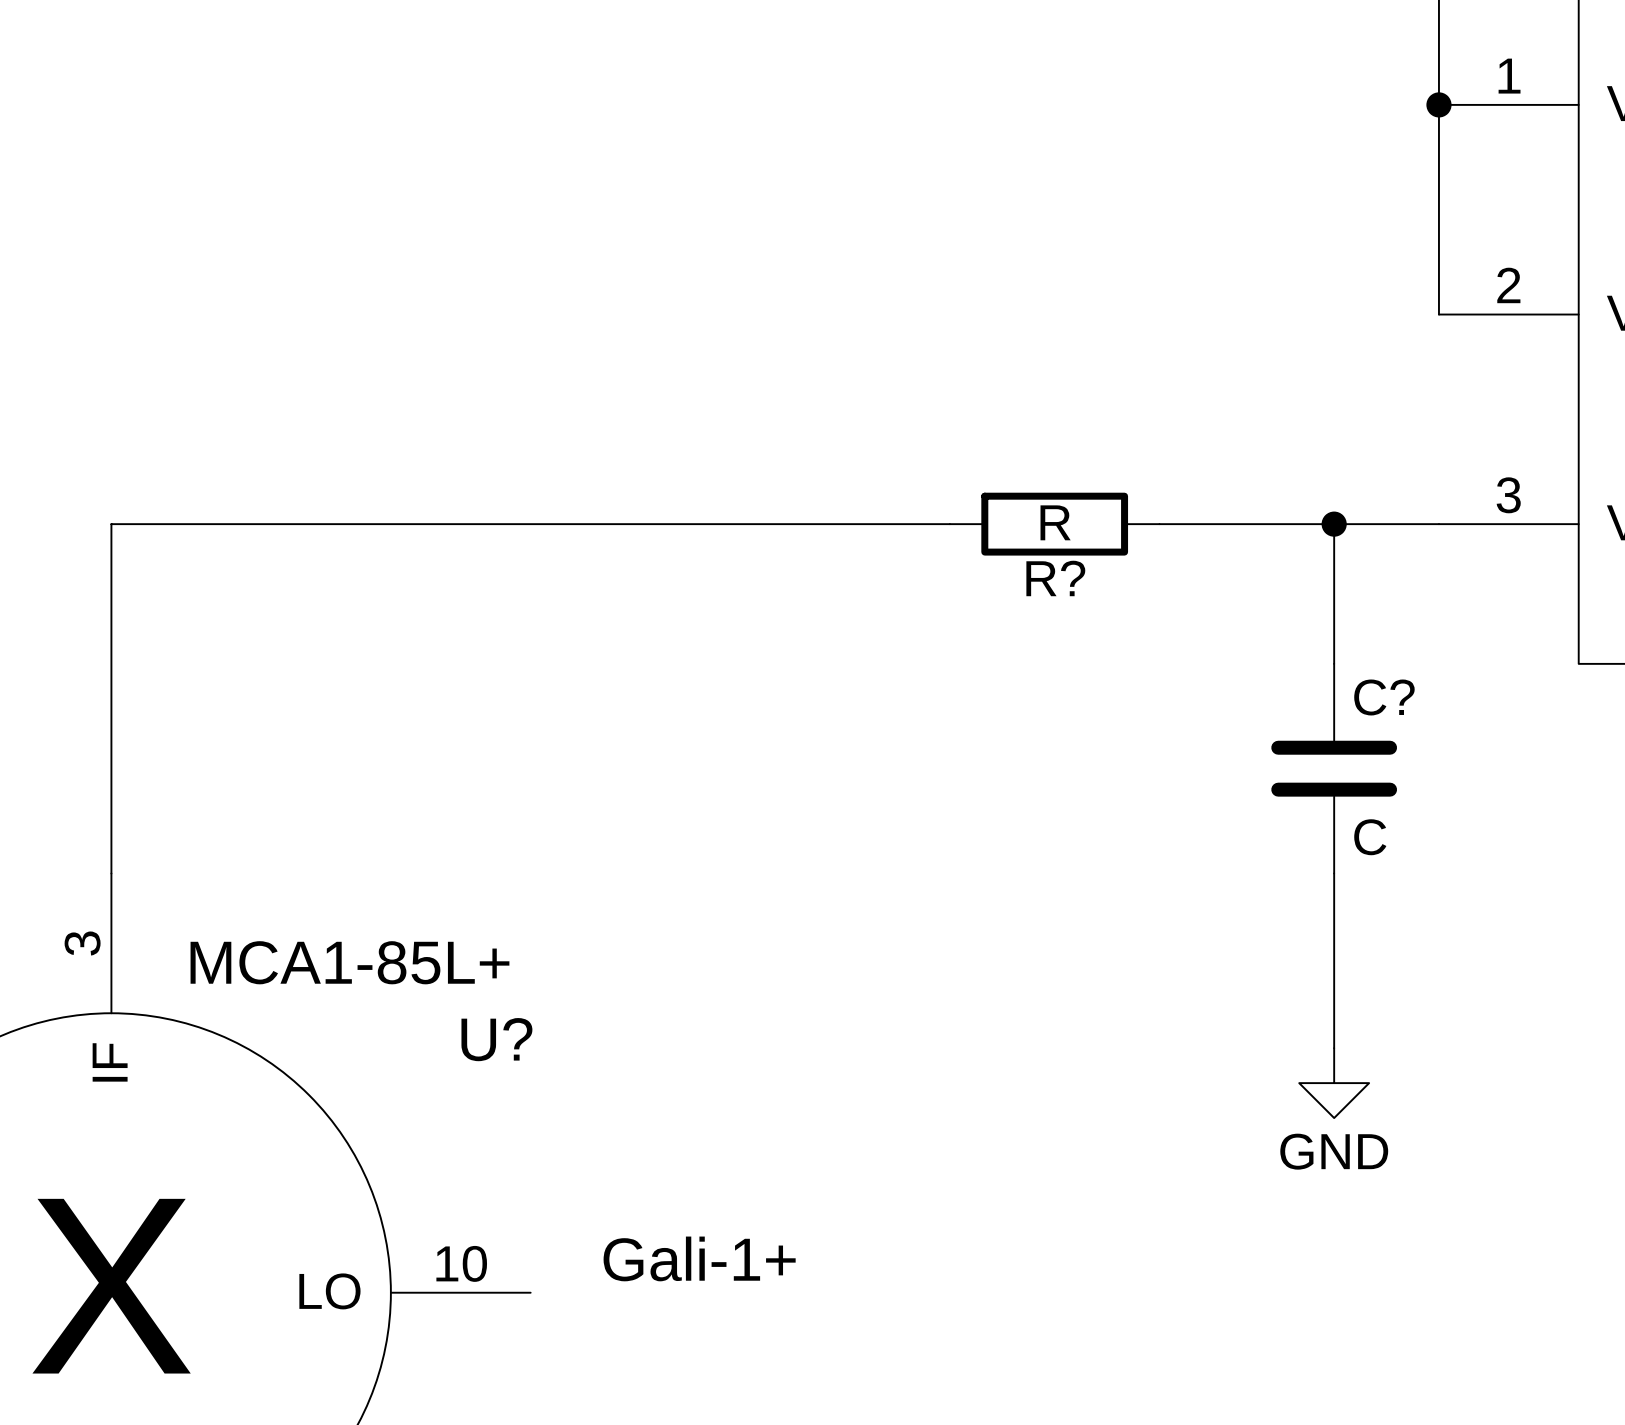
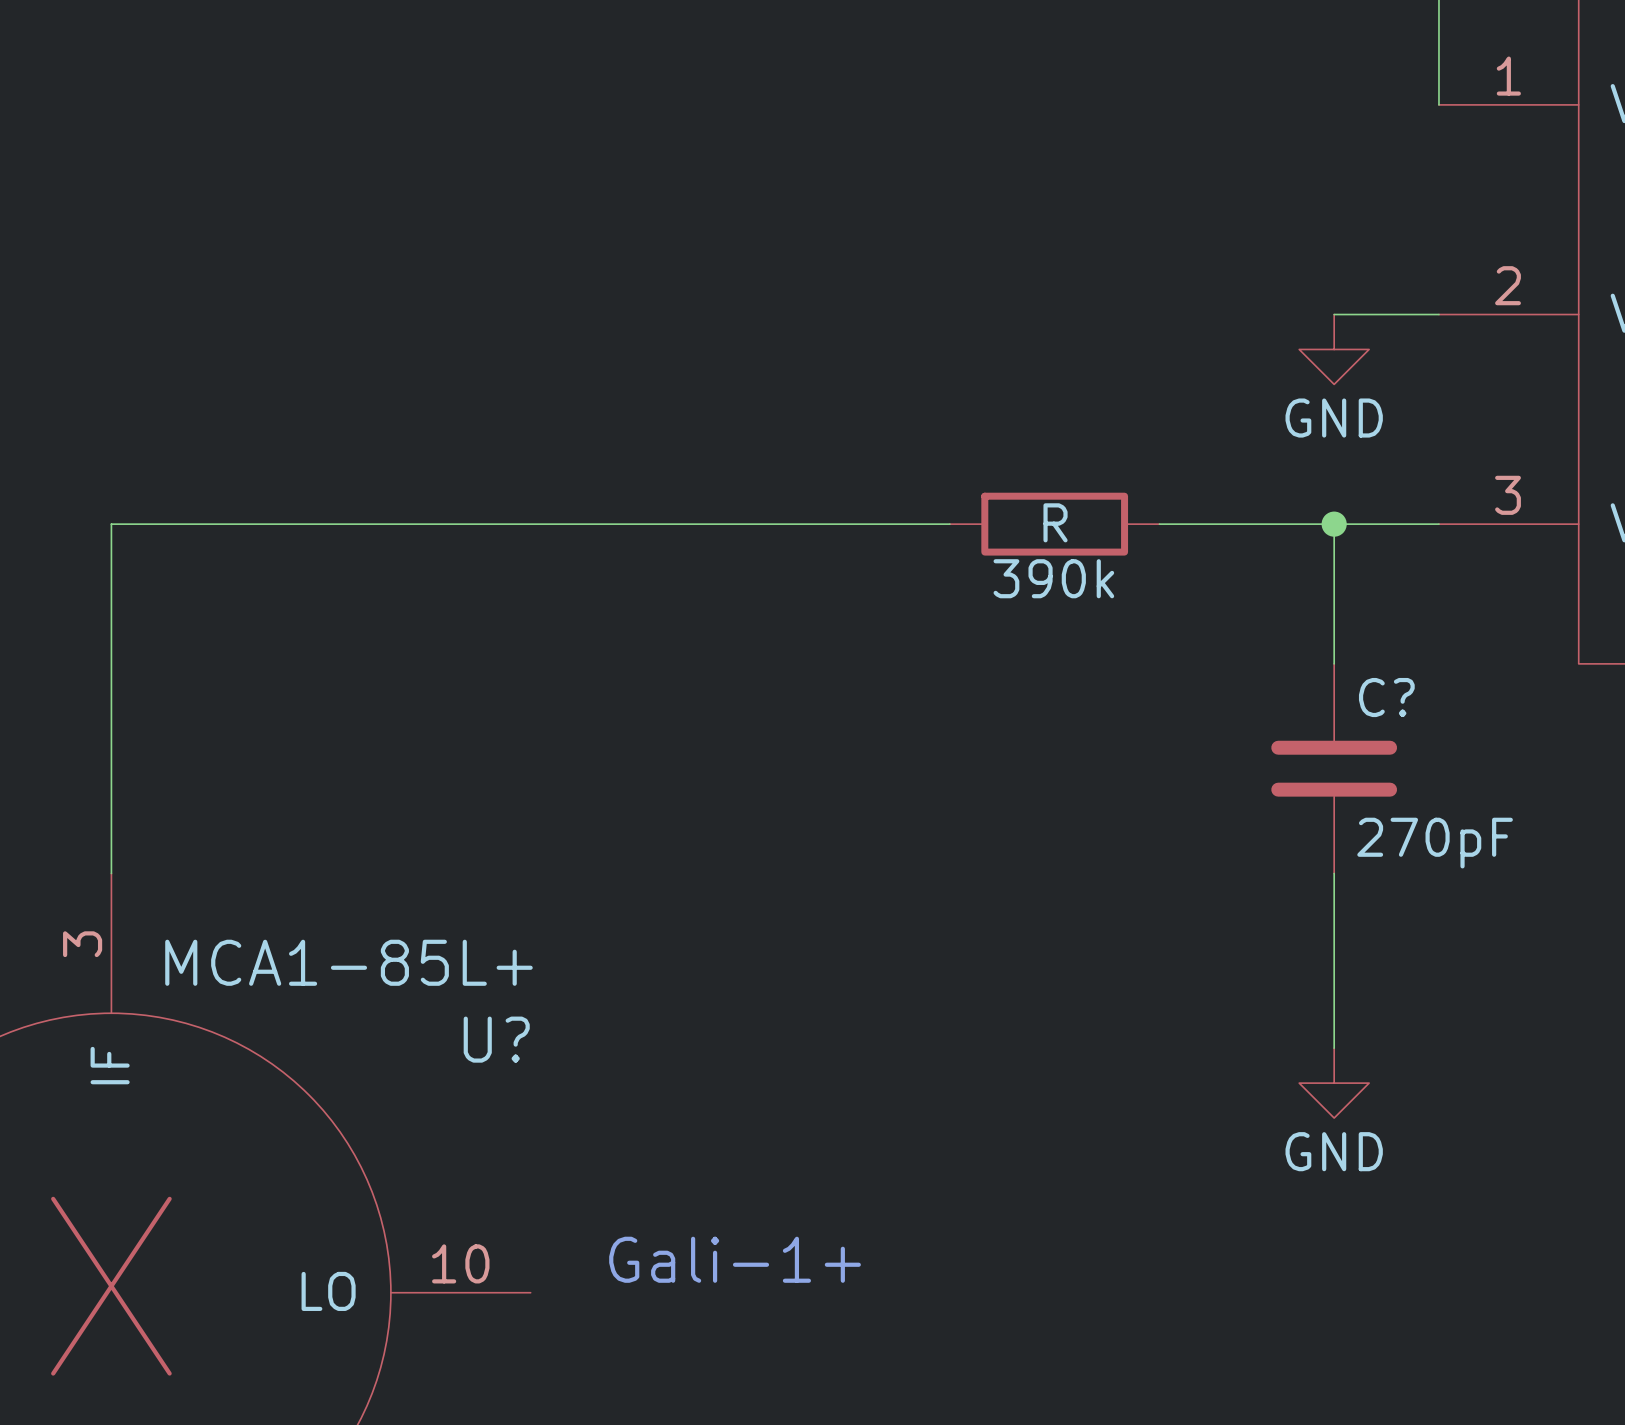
wire: (1438, 104) (1438, 314) -> (1334, 314) (1438, 314)
junction: (1438, 104) -> none
power symbol: none -> GND (1334, 349)
R? name: R? (1055, 578) -> 390k (1053, 578)
C? value: C (1370, 837) -> 270pF (1435, 843)

